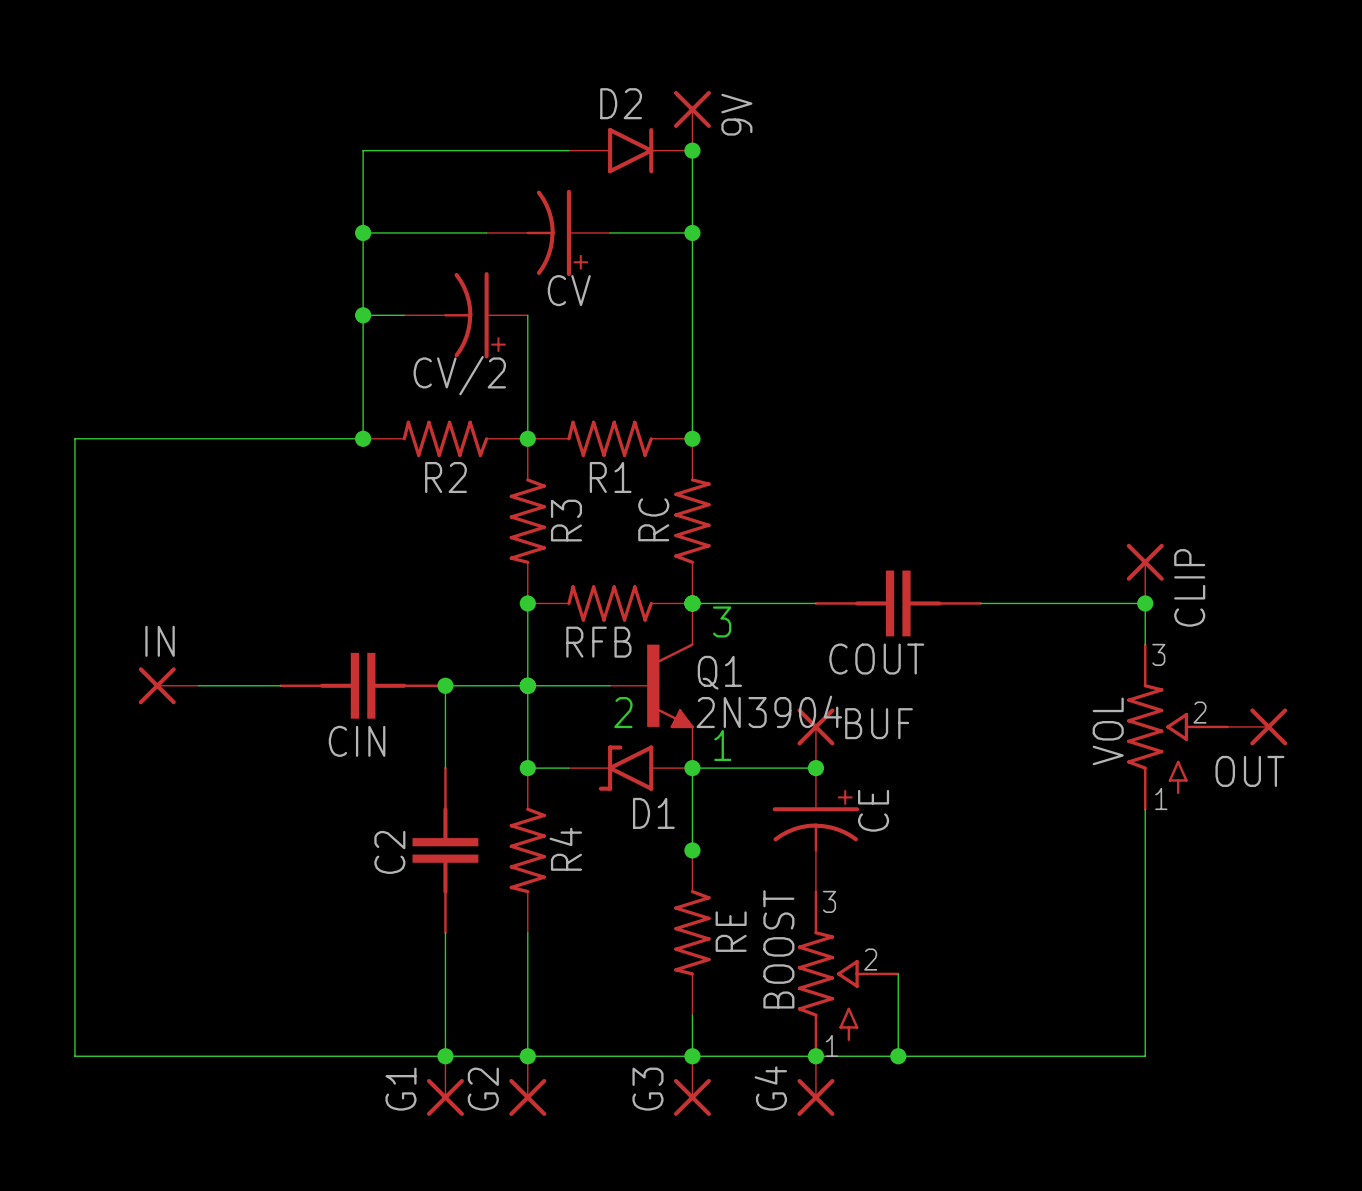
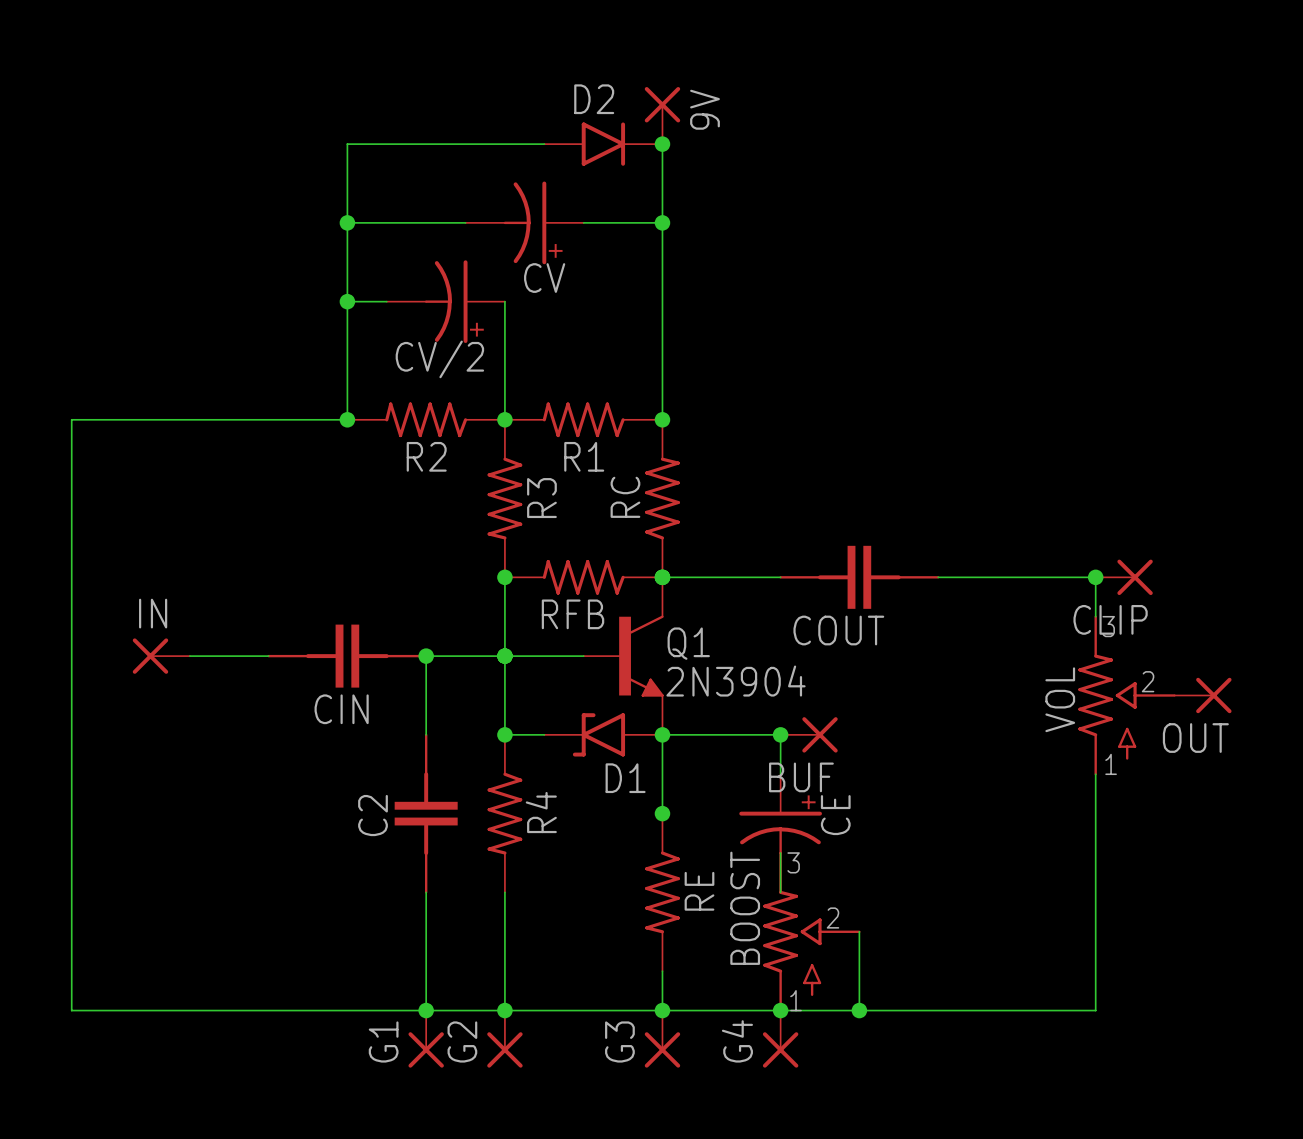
CLIP rotation: 0° (1145, 562) -> 90° clockwise (1135, 577)
CLIP position: (1145, 573) -> (1124, 577)
text: 3 (722, 621) -> none
text: 2 (623, 712) -> none
BUF name position: BUF (878, 723) -> BUF (801, 777)
BUF rotation: 0° (815, 726) -> 90° clockwise (820, 734)
BUF position: (815, 738) -> (809, 734)
text: 1 (722, 745) -> none
CE position: (815, 829) -> (780, 833)

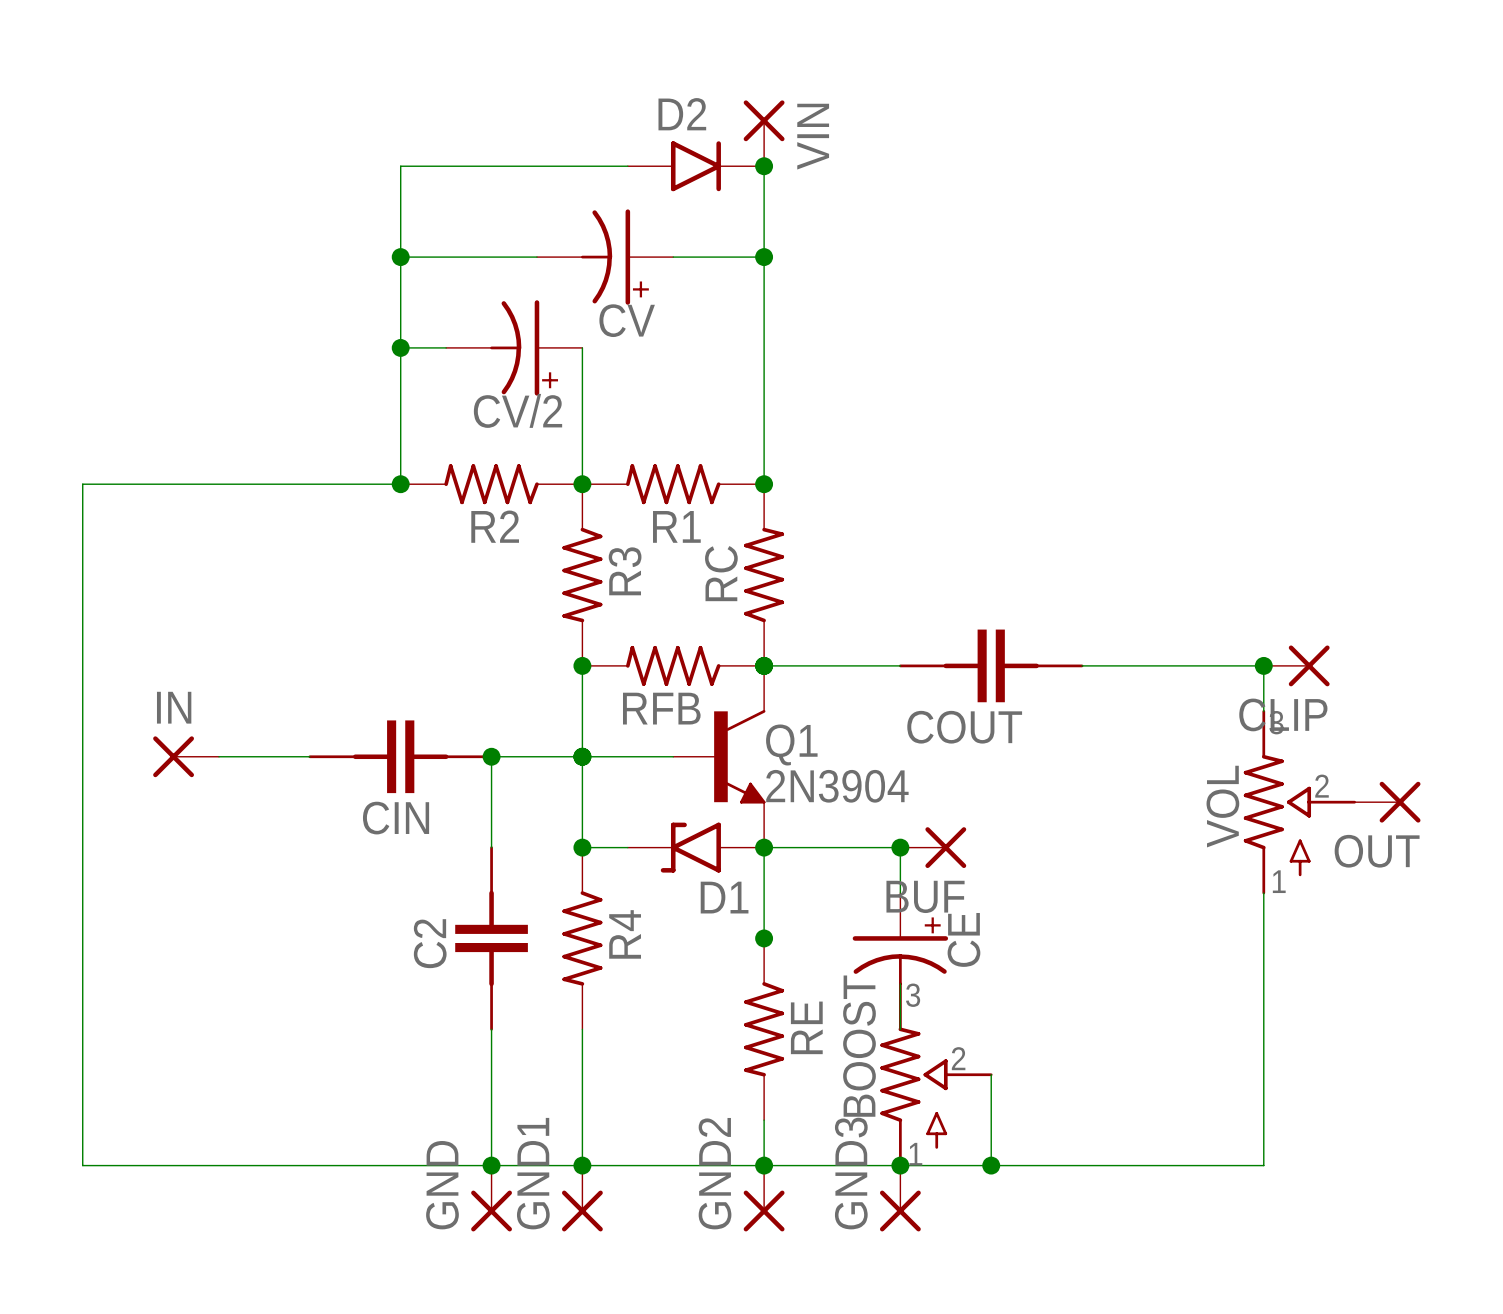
9V name: 9V (705, 109) -> VIN (813, 136)
G1 name: G1 (383, 1041) -> GND (442, 1185)
G2 name: G2 (462, 1041) -> GND1 (533, 1173)
G3 name: G3 (619, 1041) -> GND2 (715, 1173)
G4 name: G4 (737, 1041) -> GND3 (851, 1173)

